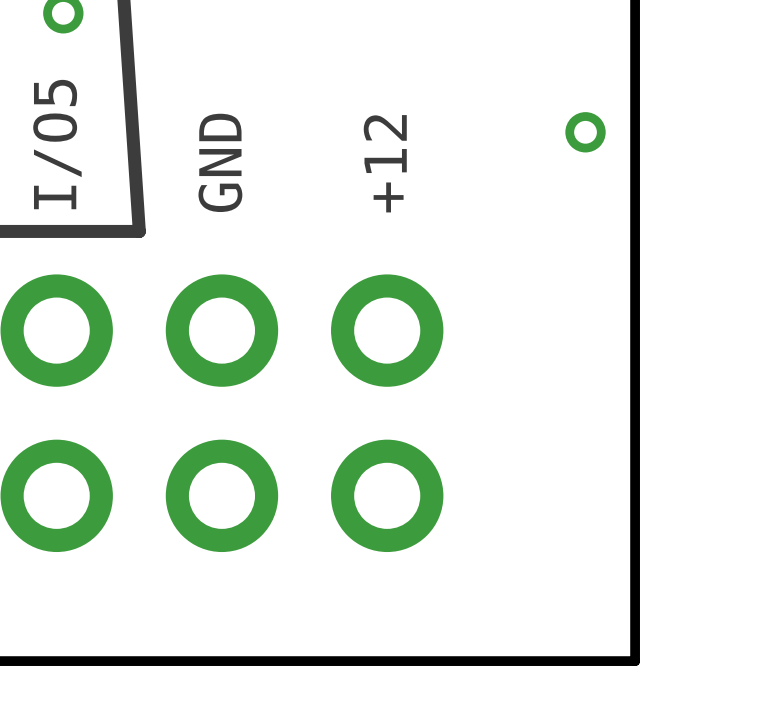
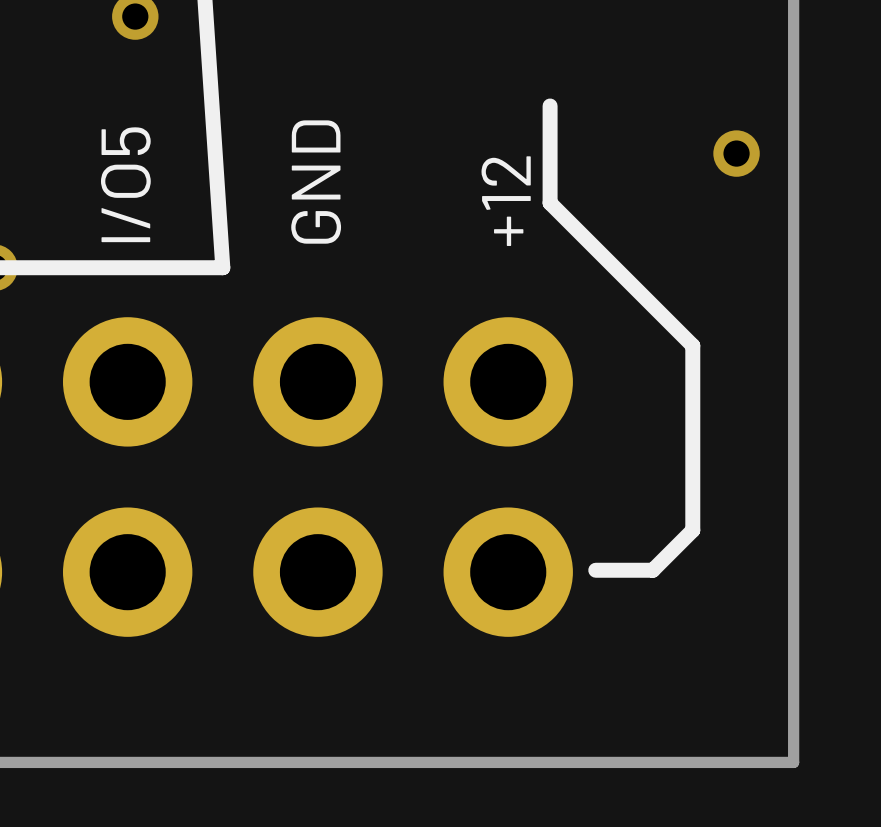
line: none -> (550, 105) (550, 203) (692, 345) (692, 530) (652, 570) (595, 570)

